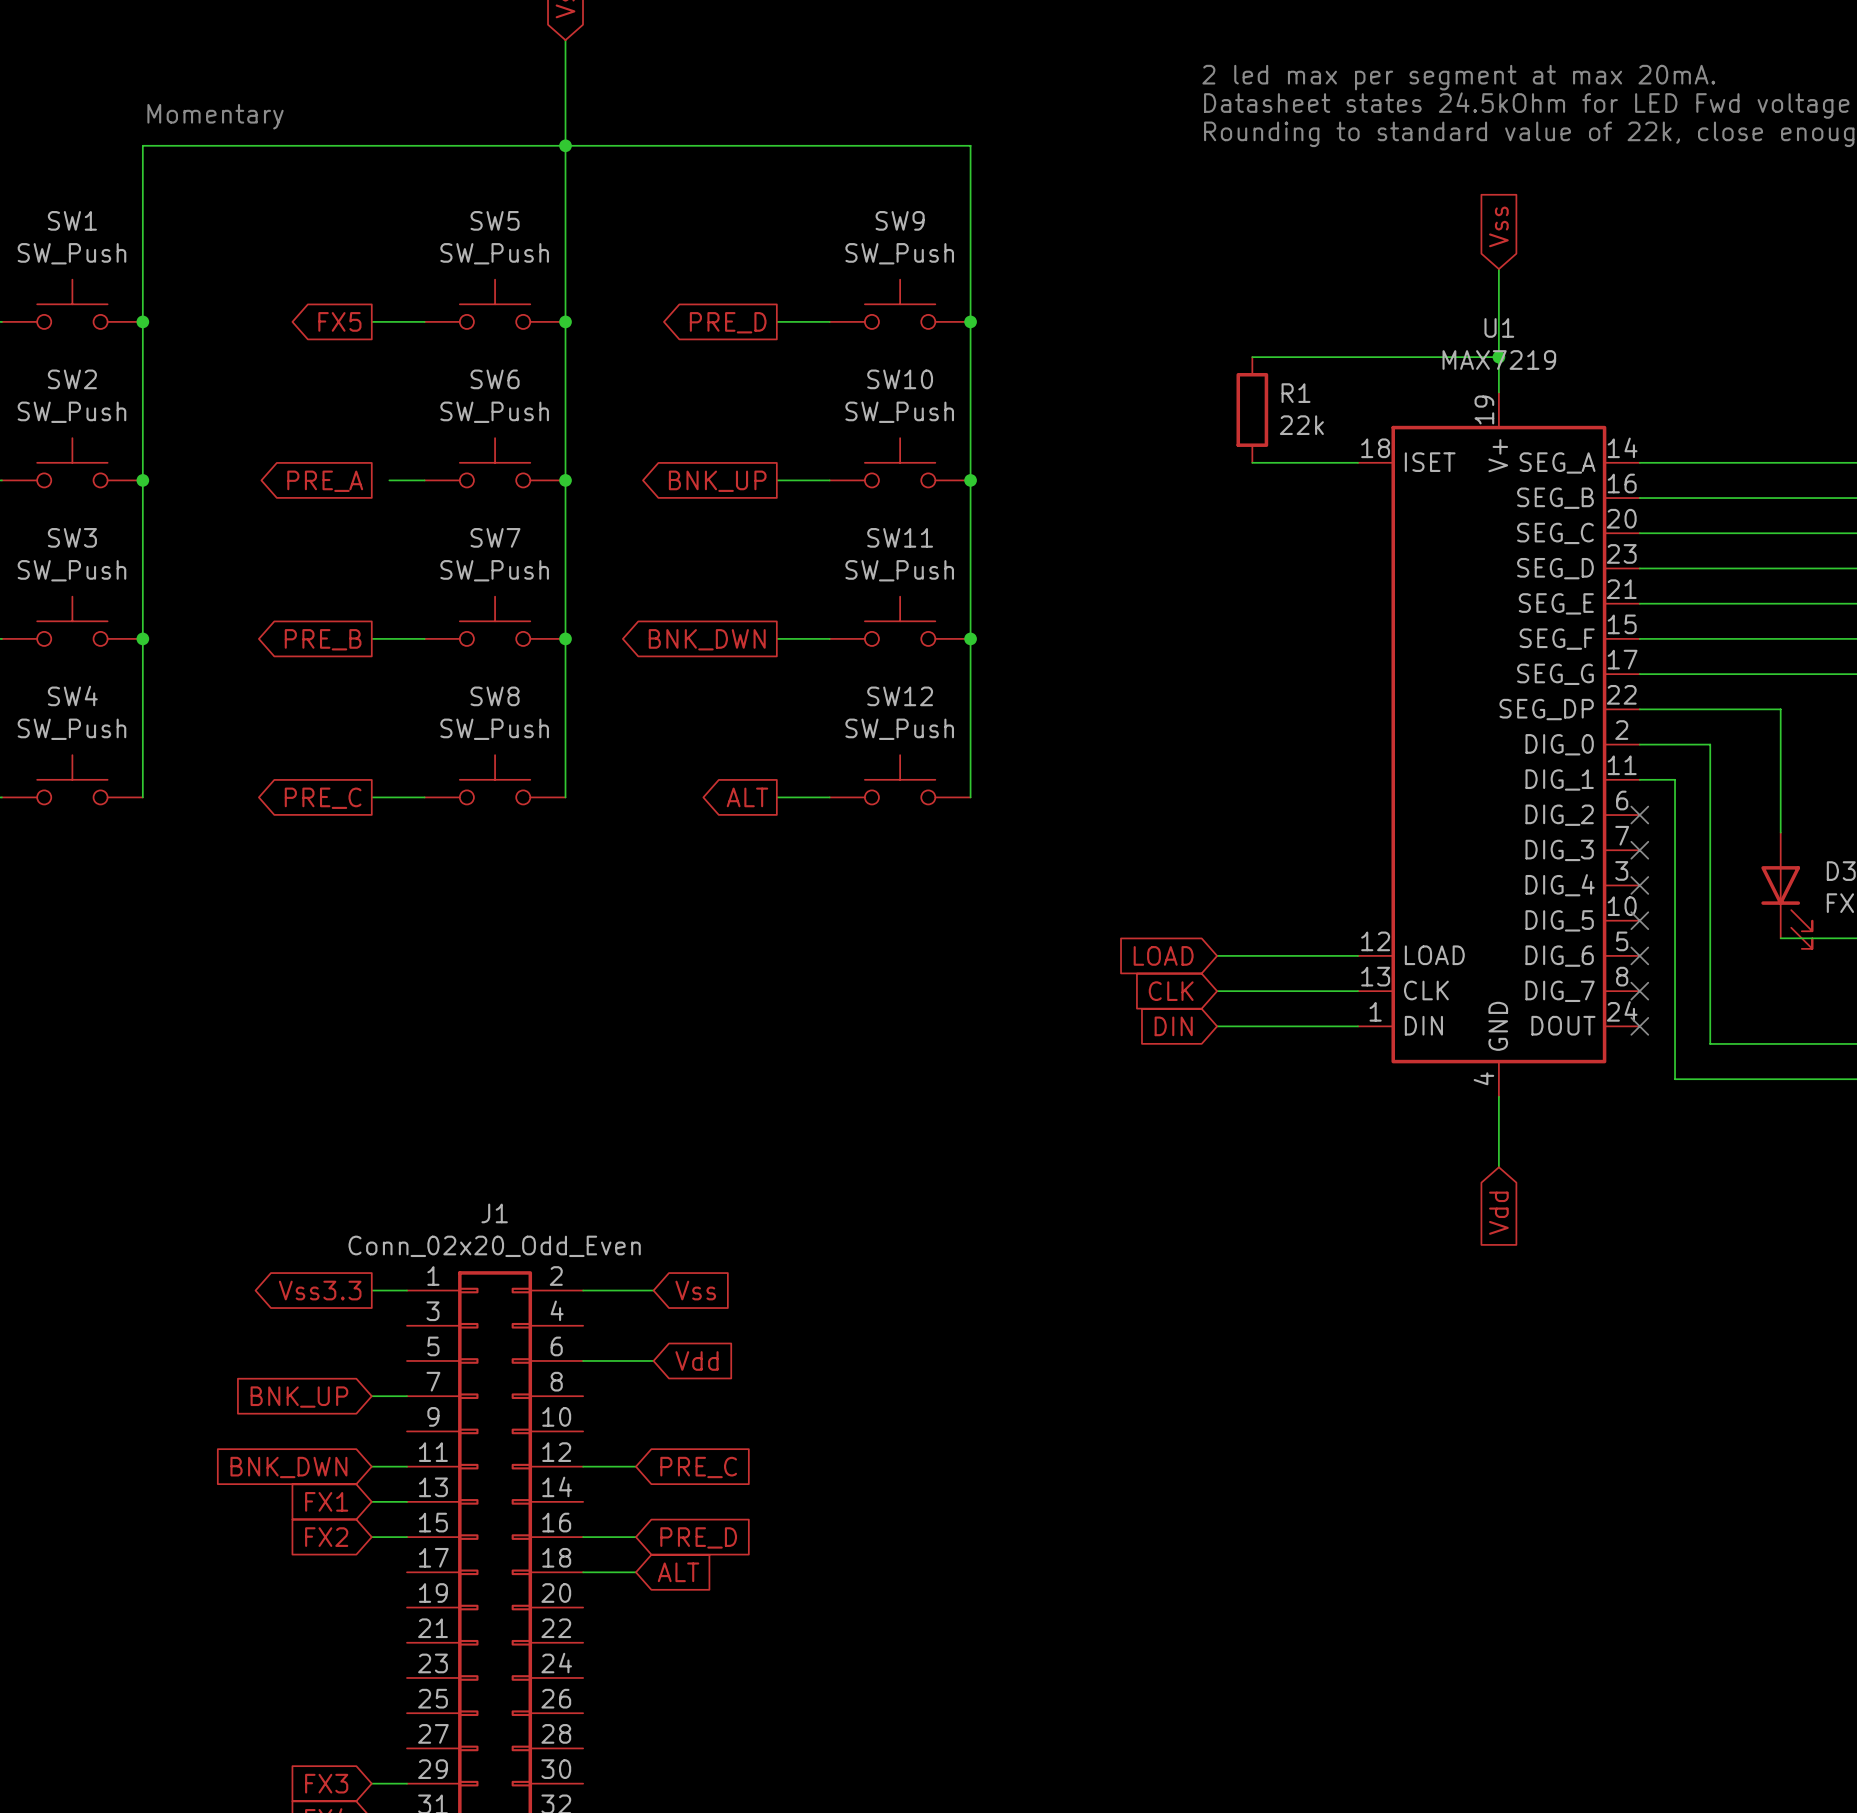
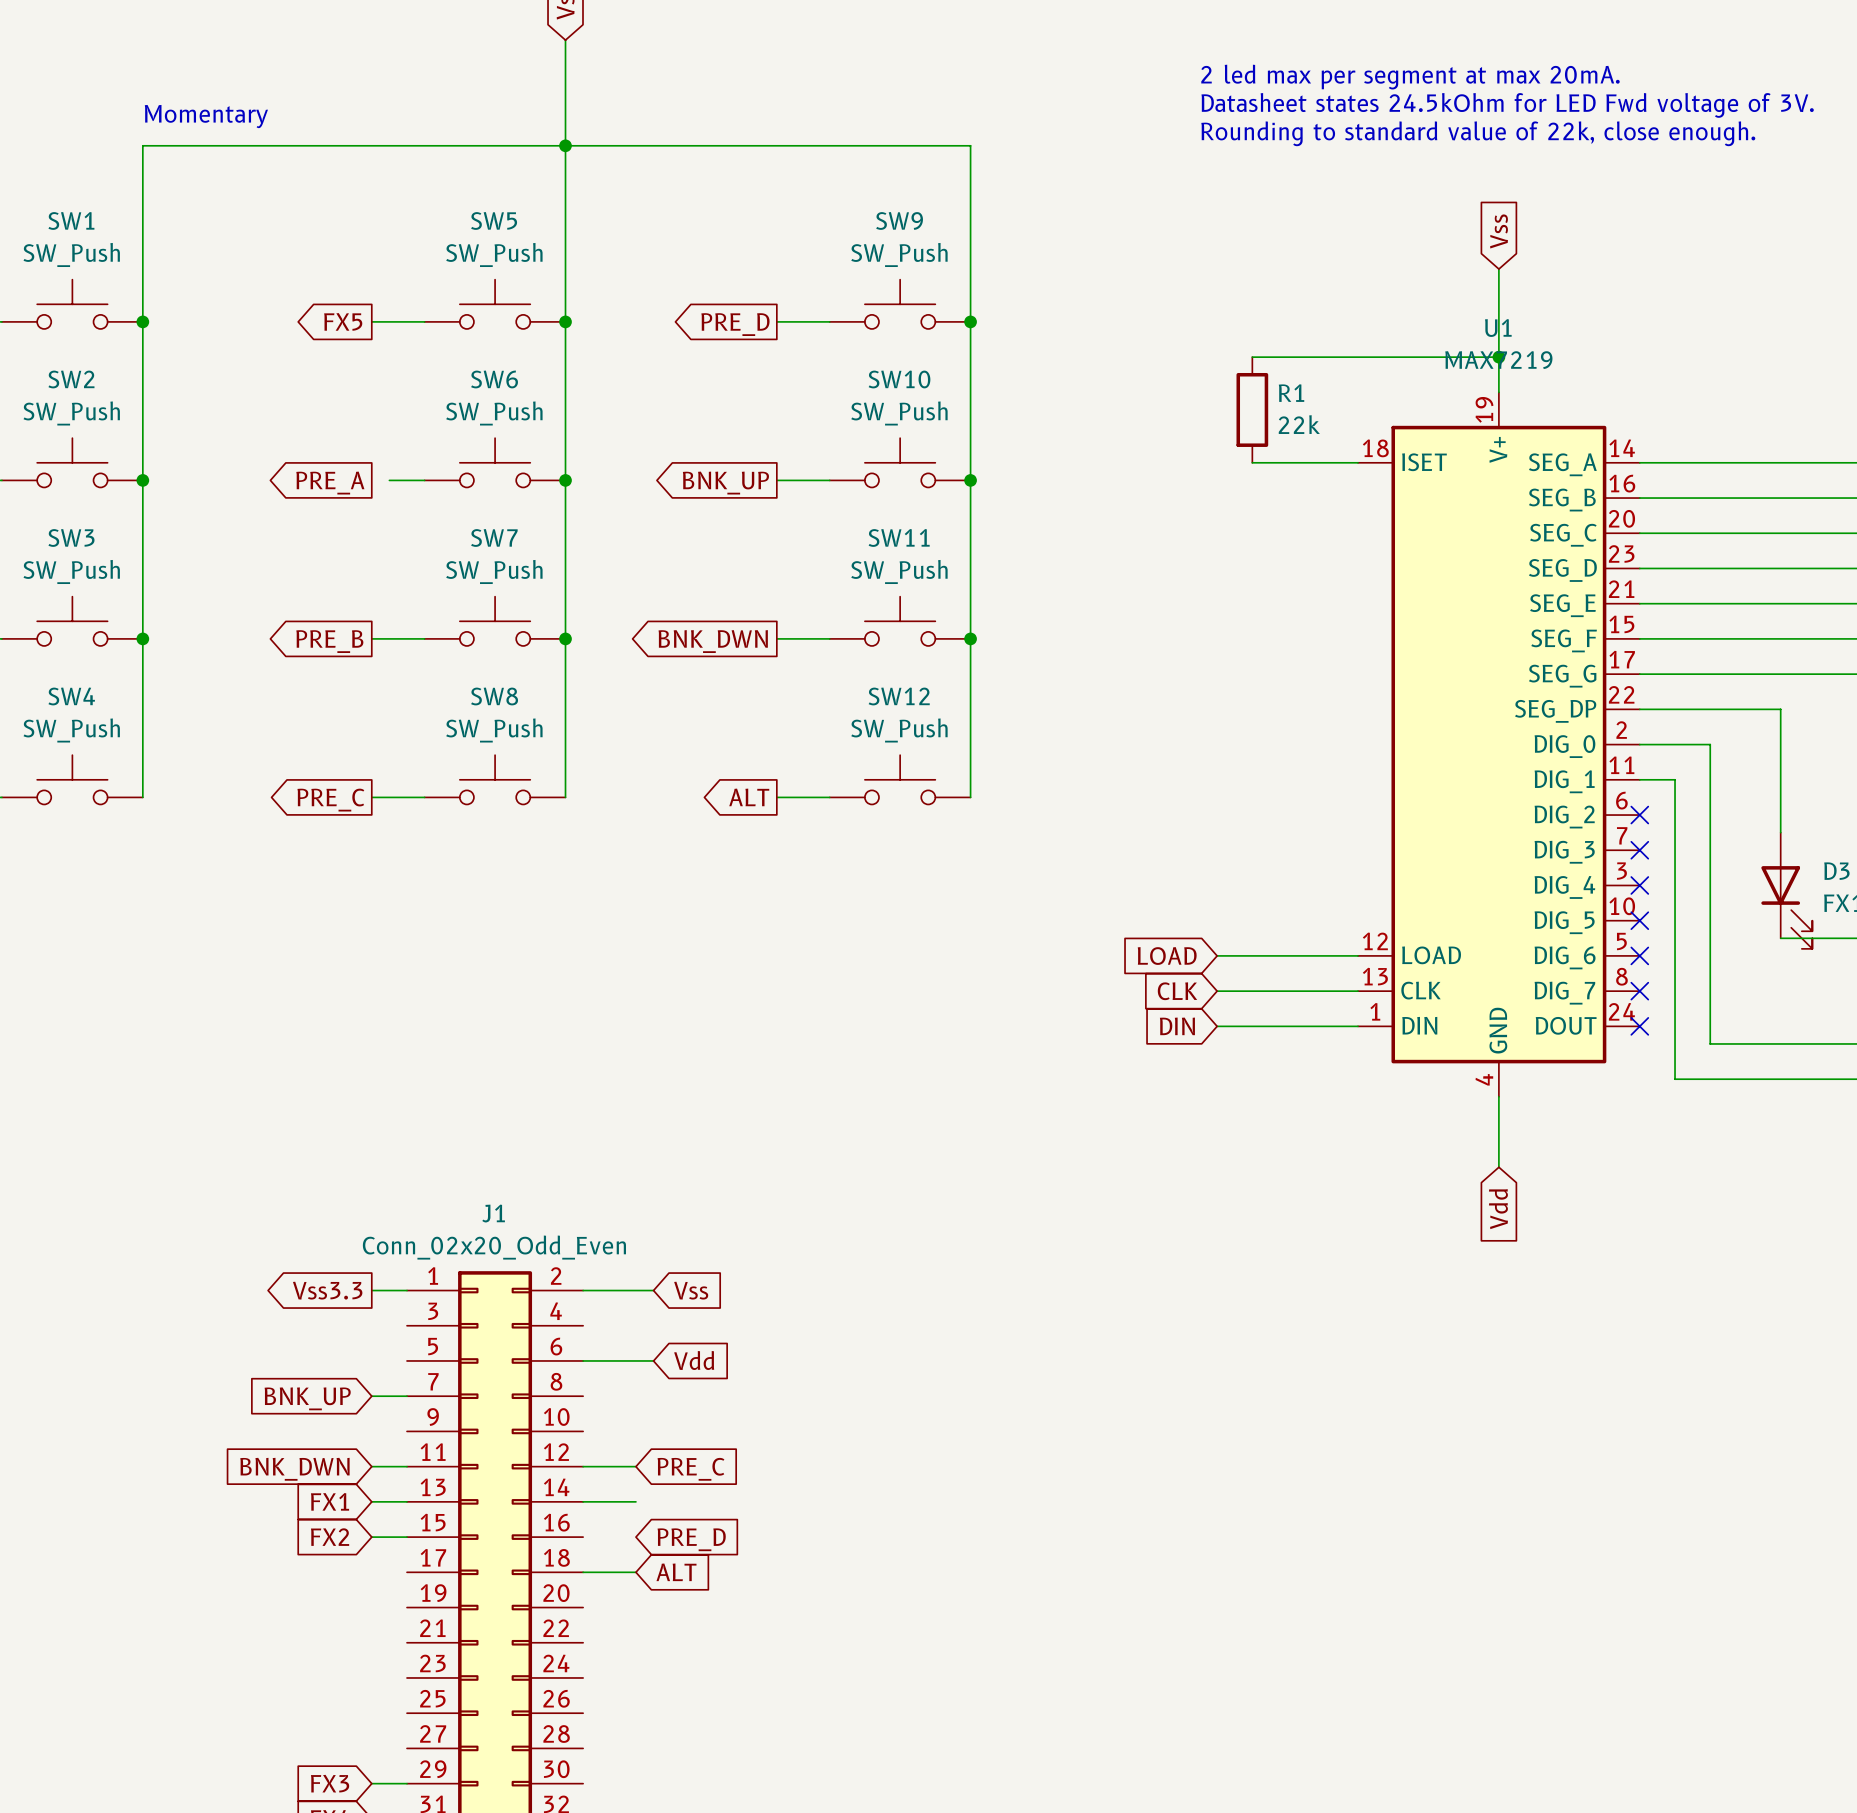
wire: (583, 1537) (635, 1537) -> (583, 1501) (635, 1501)

